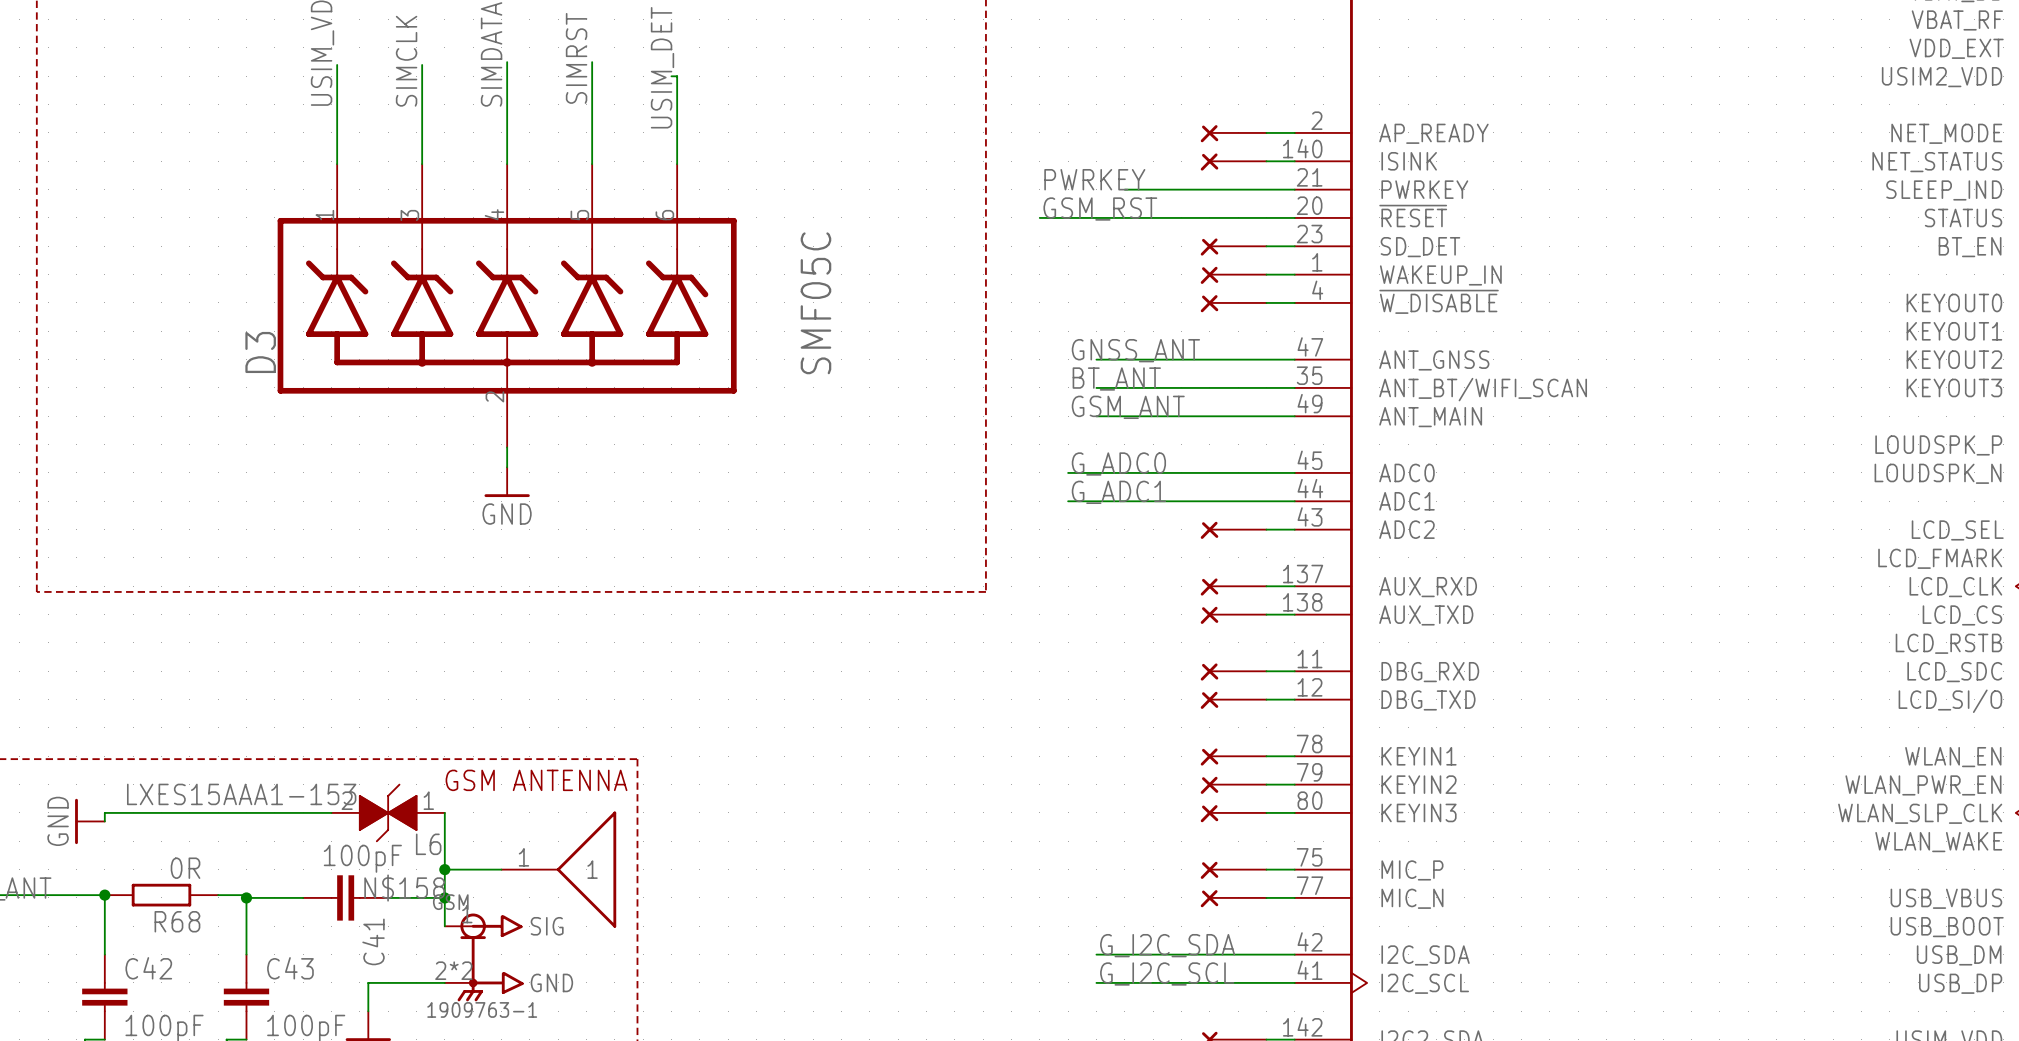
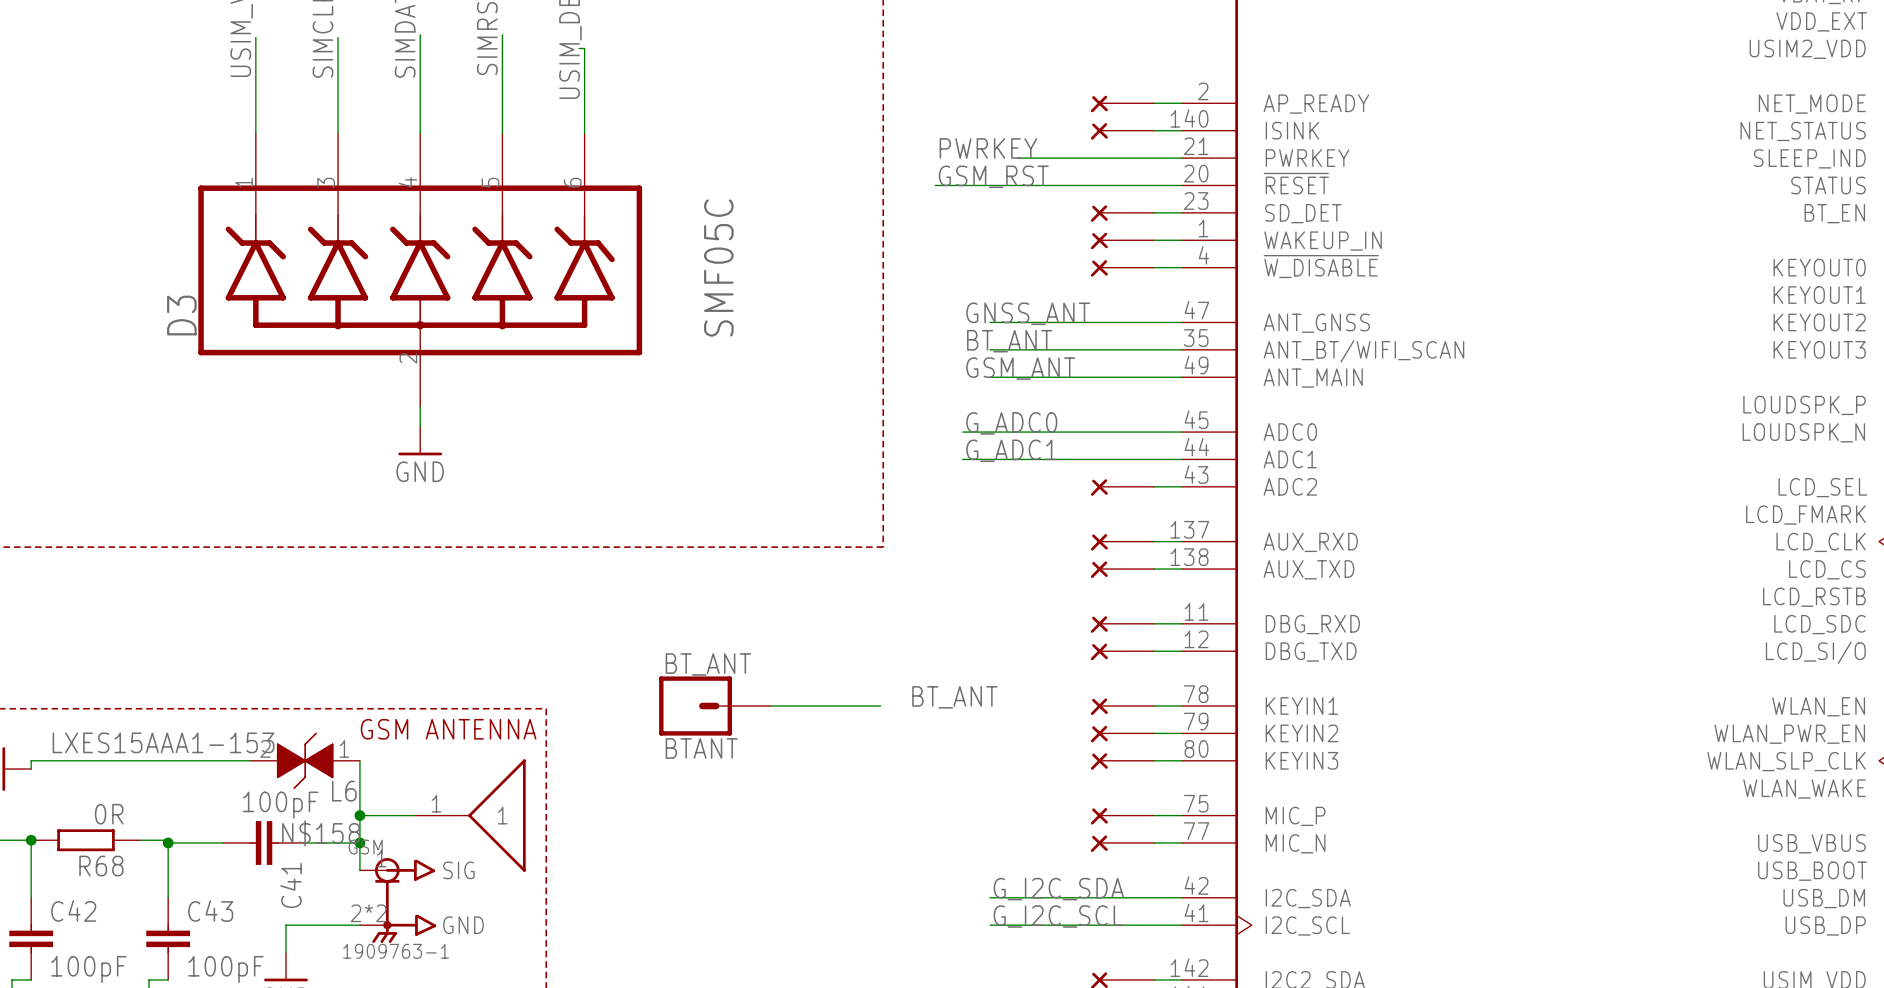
label: none -> BT_ANT (954, 697)
BT_ANT: none -> BTANT (715, 706)
wire: none -> (770, 706) (880, 706)

